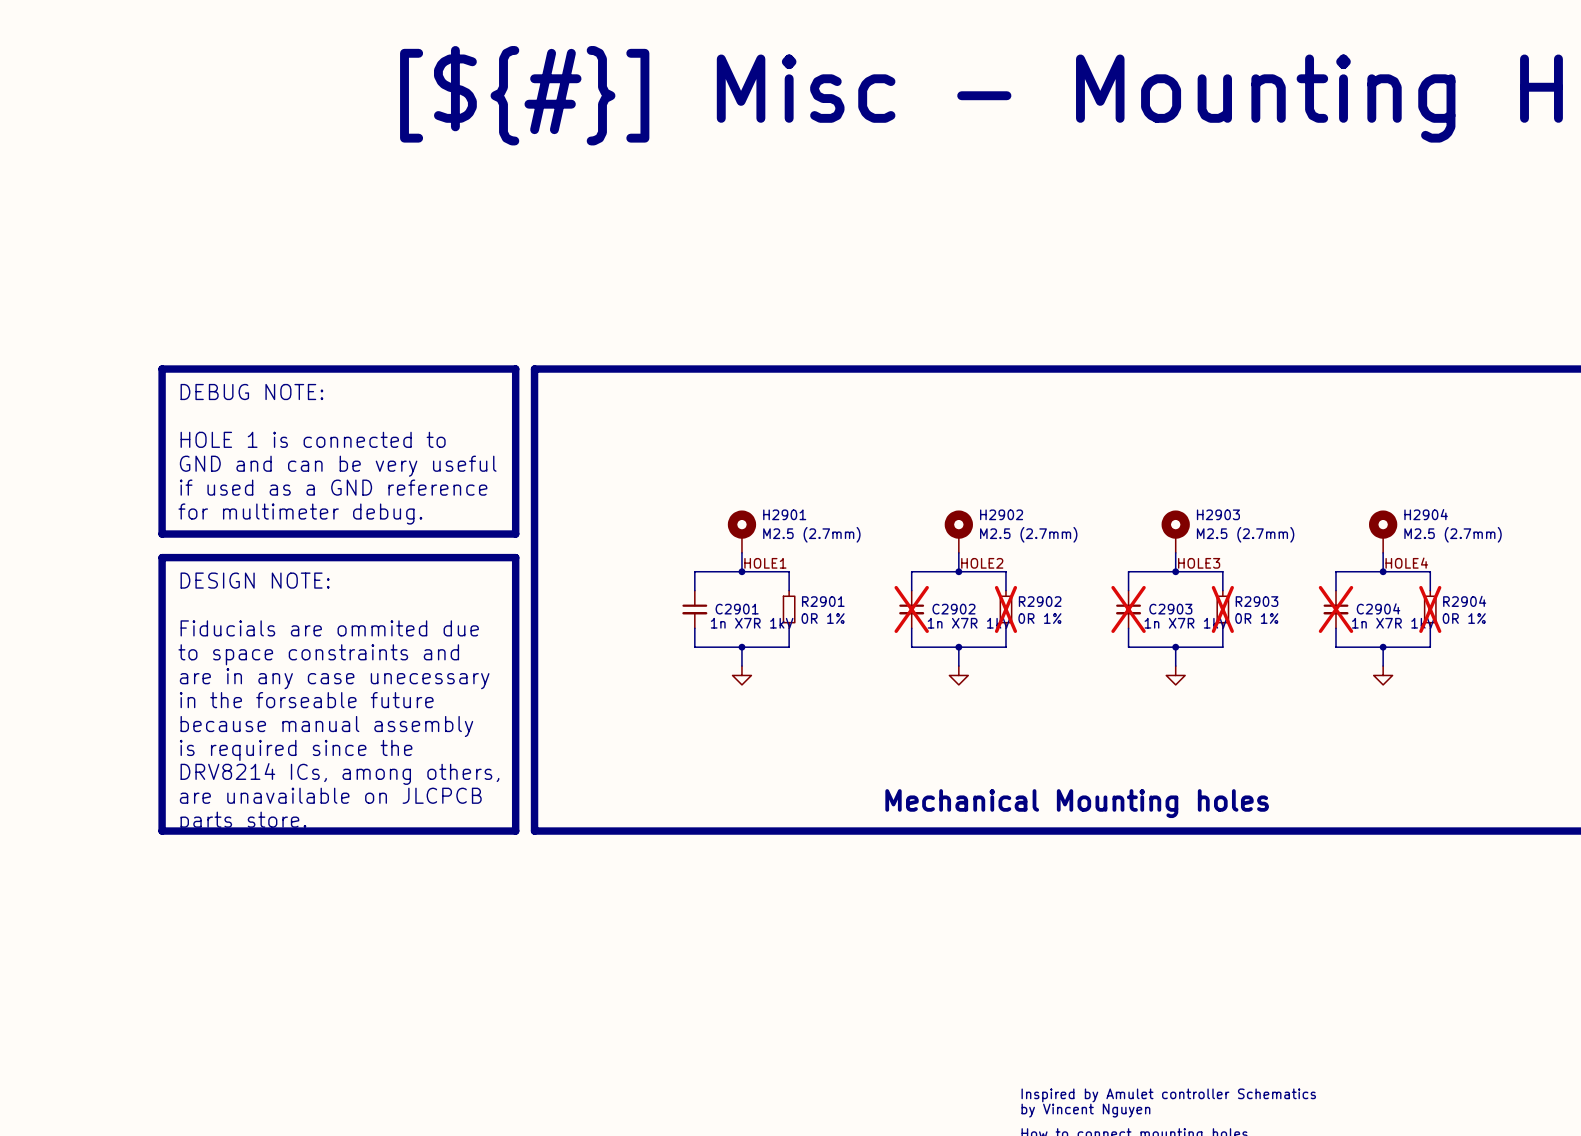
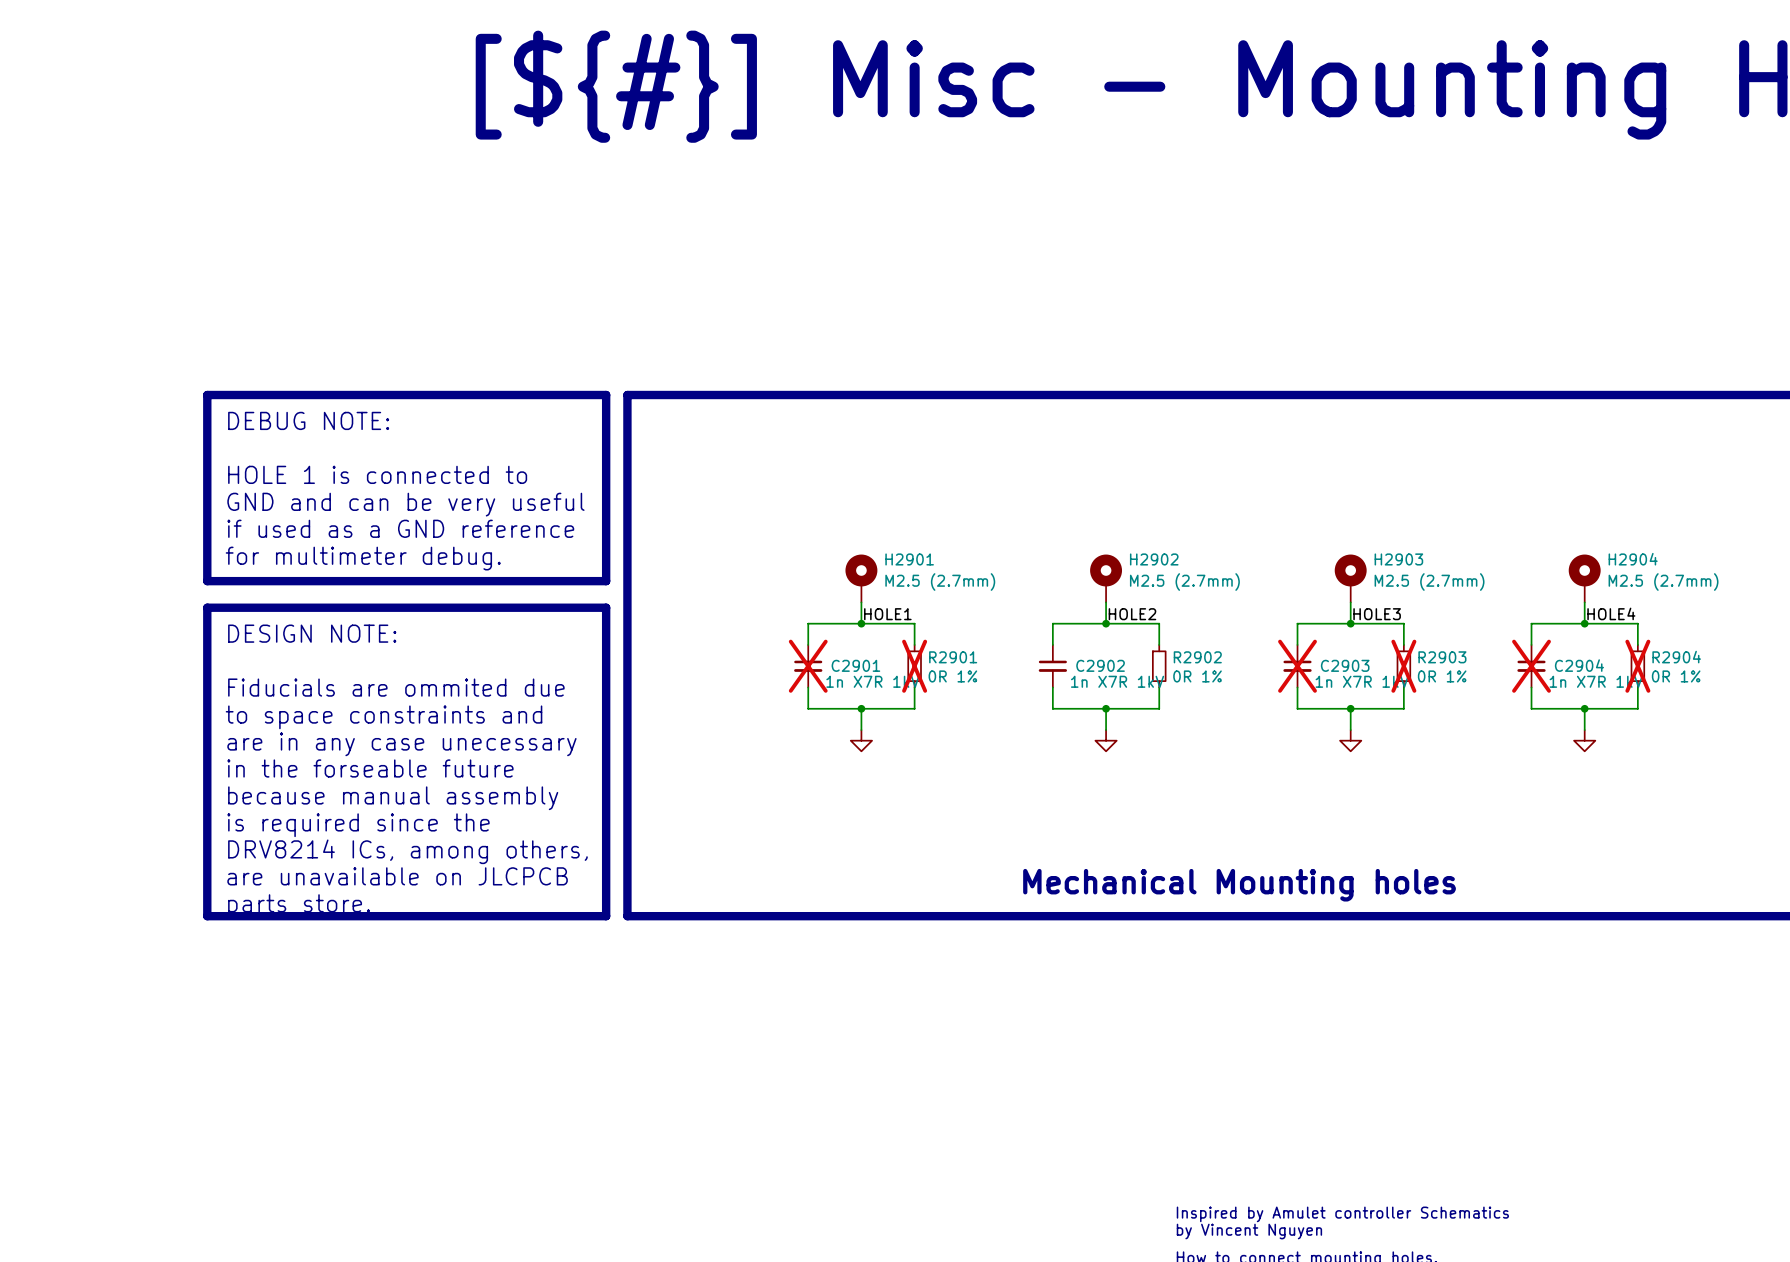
C2901 do-not-place cross: none -> (808, 666)
R2901 do-not-place cross: none -> (914, 666)
C2902 do-not-place cross: (911, 609) -> none
R2902 do-not-place cross: (1005, 609) -> none

